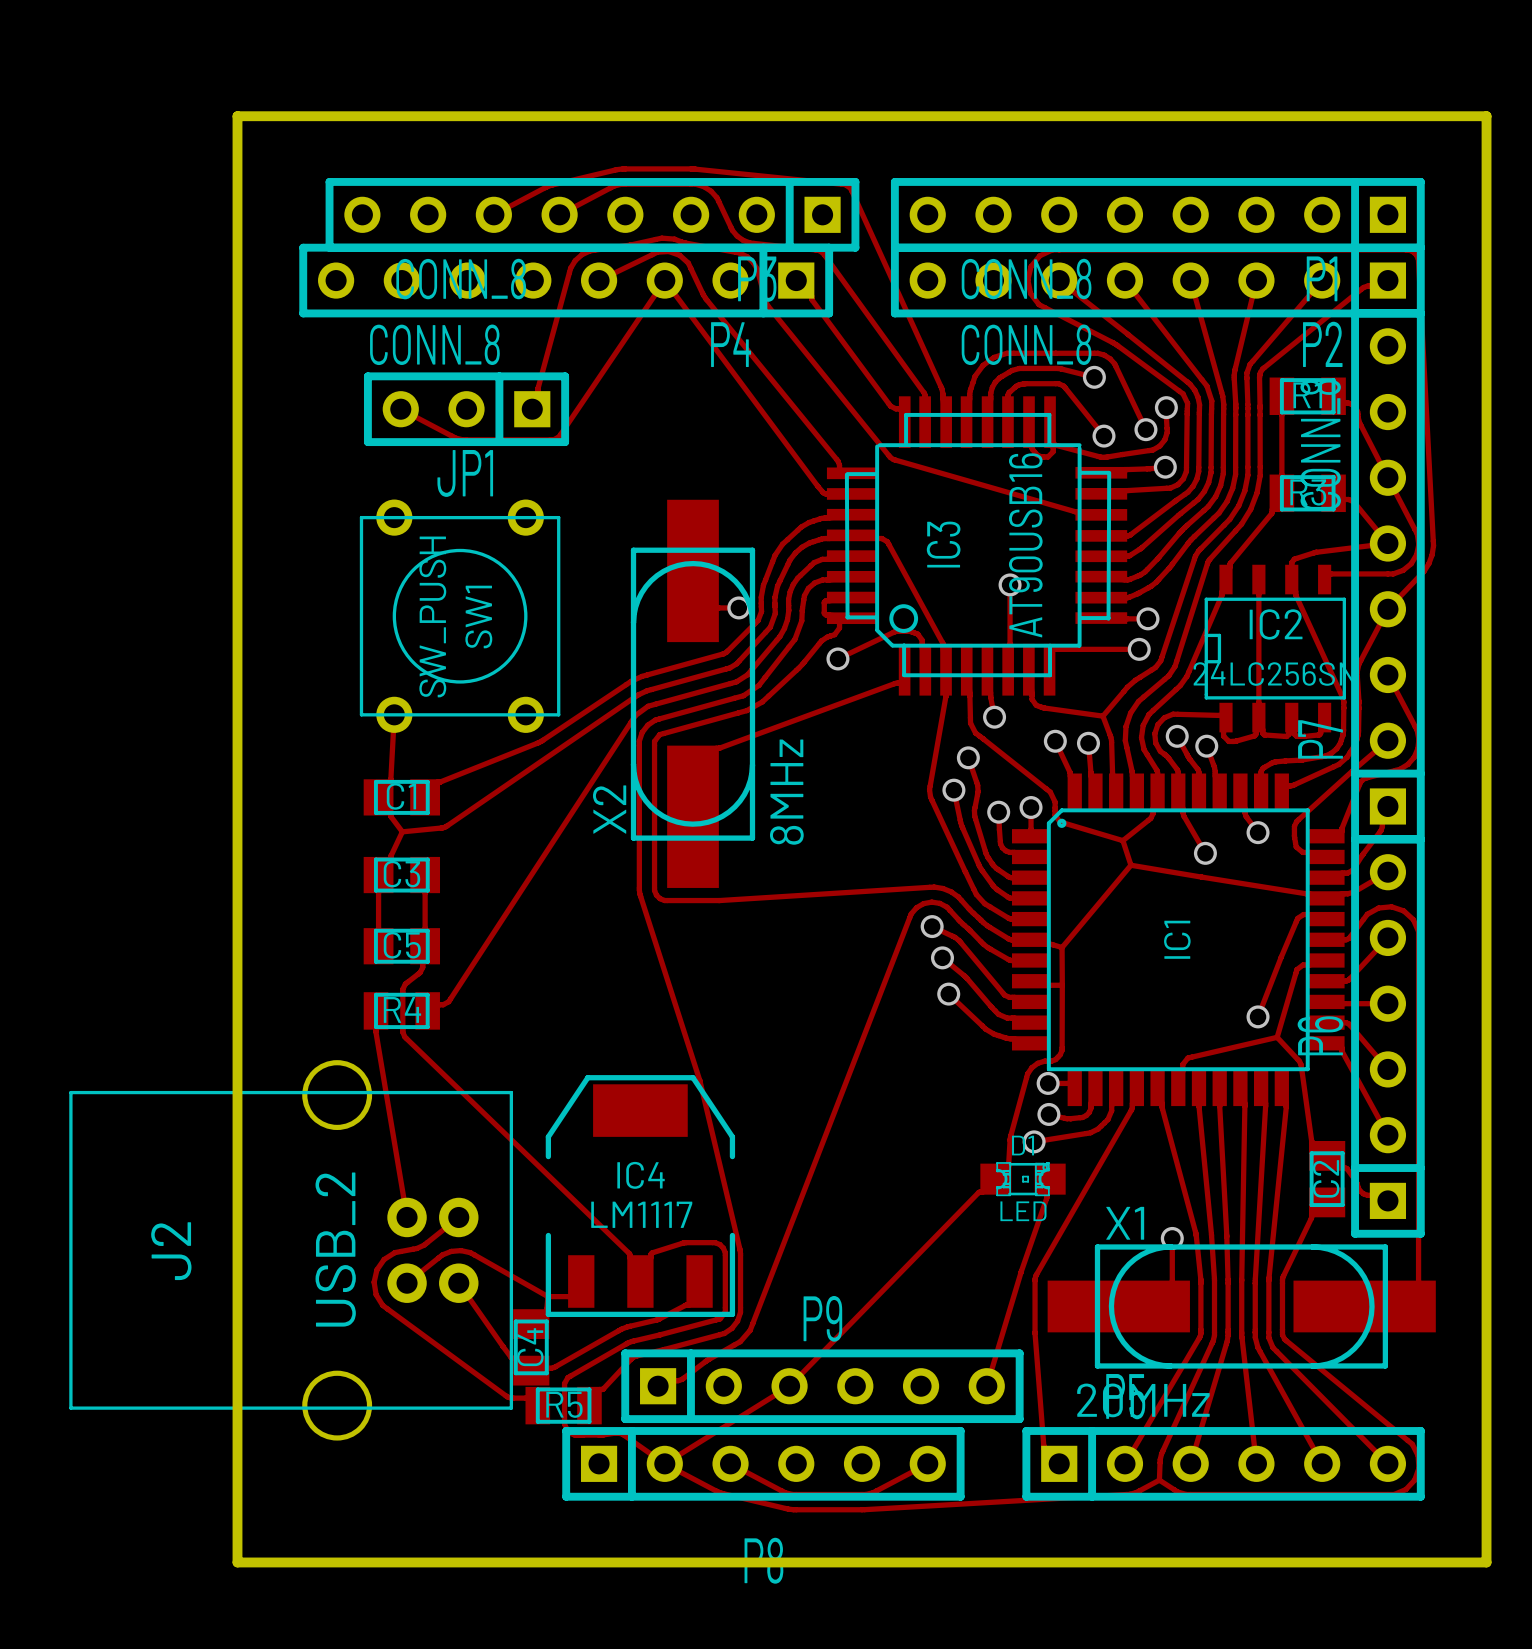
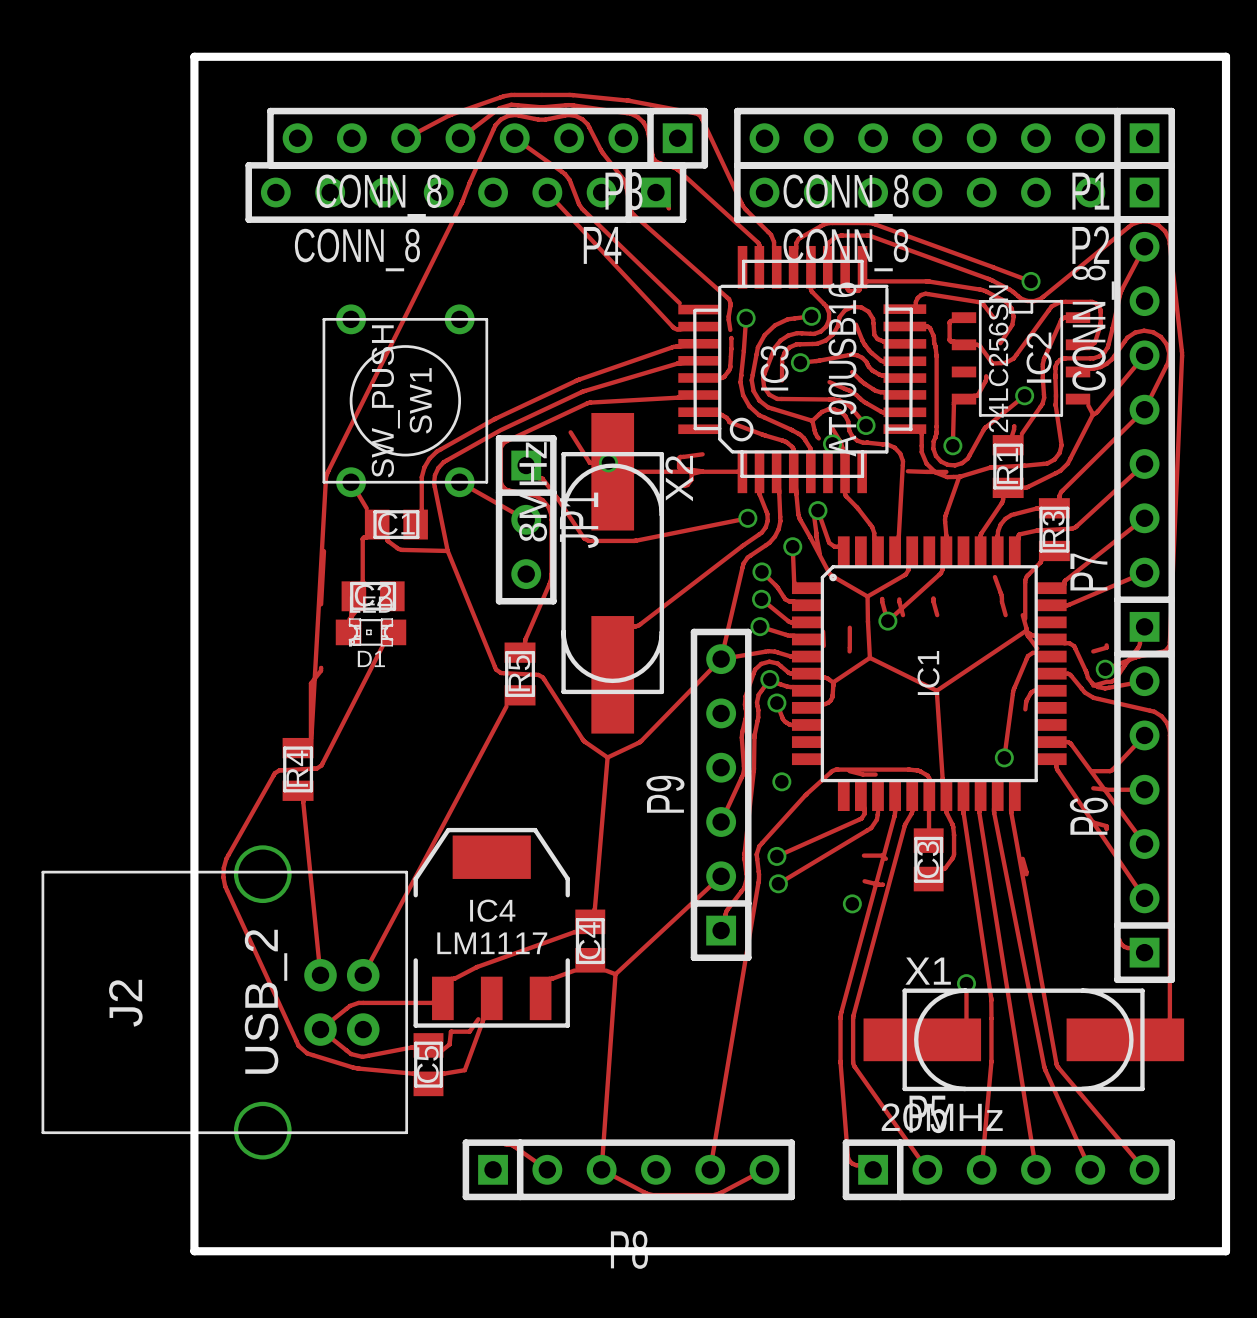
track: (545, 187) (622, 168) (694, 169) (845, 184) (850, 188) (941, 388) (946, 422) -> (448, 115) (511, 94) (570, 94) (627, 100) (696, 113) (700, 116) (742, 205) (771, 234) (774, 242) (776, 267)
track: (559, 214) (614, 185) (621, 184) (695, 184) (703, 186) (716, 197) (732, 230) (743, 240) (750, 243) (818, 250) (822, 252) (924, 393) (925, 422) -> (460, 138) (499, 108) (511, 104) (540, 107) (571, 105) (630, 113) (643, 122) (647, 129) (653, 157) (656, 162) (677, 169) (758, 243) (759, 267)
track: none -> (514, 138) (565, 174) (569, 179) (582, 208) (679, 303)
track: (599, 280) (657, 252) (668, 251) (679, 255) (688, 263) (705, 298) (838, 461) (839, 470) (852, 473) -> none
track: none -> (547, 192) (673, 328) (680, 329) (699, 326)
track: (1059, 280) (1190, 384) (1198, 397) (1199, 404) (1198, 471) (1193, 486) (1187, 492) (1129, 535) (1101, 535) -> none
track: (1124, 280) (1206, 386) (1211, 400) (1211, 472) (1204, 491) (1198, 499) (1141, 547) (1128, 556) (1101, 556) -> none
track: (1190, 280) (1222, 396) (1223, 473) (1220, 485) (1208, 506) (1181, 530) (1145, 571) (1128, 579) (1101, 576) -> none
track: (1256, 280) (1234, 370) (1235, 414) -> none
track: (1322, 280) (1250, 364) (1246, 372) (1247, 475) (1244, 490) (1238, 505) (1229, 519) (1195, 556) (1160, 660) (1155, 667) (1127, 687) (1102, 716) -> none
track: (1387, 280) (1363, 287) (1260, 372) (1260, 475) (1257, 492) (1250, 509) (1241, 524) (1207, 562) (1175, 666) (1168, 675) (1138, 701) (1130, 713) (1126, 726) (1125, 740) (1132, 771) -> none
track: (812, 300) (890, 406) (901, 408) (904, 422) -> none
track: none -> (1144, 246) (1121, 290) (1107, 347) (1104, 352) (1093, 358) (1063, 358) (1057, 362) (1055, 404) (1061, 445) (1059, 453) (1054, 459) (1047, 463) (990, 467) (959, 476)
track: none -> (793, 267) (796, 243) (798, 238) (829, 223) (869, 223) (1031, 281)
track: none -> (810, 267) (810, 289) (826, 306) (828, 320) (820, 331) (814, 333) (797, 333) (780, 340) (774, 347) (763, 377) (764, 387) (769, 394) (777, 398) (830, 399)
track: none -> (827, 267) (827, 244) (834, 237) (841, 235) (868, 235) (989, 279) (1009, 289) (1020, 298) (1034, 301) (1040, 298) (1132, 224) (1140, 221) (1149, 221) (1158, 225) (1165, 231) (1169, 239) (1182, 355) (1169, 645) (1165, 651) (1136, 657) (1105, 669)
track: none -> (845, 267) (849, 290) (859, 289) (862, 267) (865, 281) (928, 281) (985, 290) (1006, 301) (1011, 308) (1013, 316) (1012, 324) (1000, 343)
track: (1094, 377) (1057, 368) (1019, 368) (1012, 370) (999, 377) (992, 387) (987, 422) -> none
via: (1094, 377) -> none
via: none -> (1031, 281)
track: (1281, 396) (1281, 493) (1271, 513) -> none
R1 rotation: 0° (1307, 396) -> 90° clockwise (1008, 466)
R1 position: (1307, 396) -> (1008, 466)
track: (1333, 396) (1355, 407) (1359, 423) (1417, 534) (1418, 544) (1416, 554) (1411, 563) (1403, 570) (1393, 573) (1328, 573) (1324, 579) -> none
track: (1166, 407) (1167, 432) (1159, 446) (1152, 449) (1122, 454) -> none
via: (1166, 407) -> none
track: (400, 409) (455, 438) (462, 439) (553, 439) (559, 436) (664, 280) (823, 492) (852, 493) -> none
JP1 rotation: 0° (466, 409) -> 90° counterclockwise (526, 519)
JP1 position: (466, 409) -> (526, 519)
track: (532, 409) (570, 268) (575, 260) (590, 250) (661, 238) (674, 239) (684, 242) (739, 253) (753, 262) (757, 269) (767, 305) (890, 457) (1074, 511) -> none
track: (1235, 414) (1235, 474) (1227, 501) (1219, 513) (1190, 540) (1170, 567) (1151, 586) (1127, 597) (1101, 597) -> none
track: none -> (904, 309) (915, 306) (917, 297) (925, 293) (979, 302) (993, 317)
track: (966, 422) (970, 390) (975, 376) (983, 365) (994, 357) (1006, 353) (1097, 353) (1104, 355) (1114, 363) (1145, 429) -> none
track: (1007, 422) (1007, 395) (1016, 386) (1025, 383) (1058, 383) (1063, 386) (1104, 436) -> none
via: (1145, 429) -> none
track: none -> (811, 316) (787, 319) (774, 325) (764, 335) (757, 347) (751, 380) (753, 391) (759, 400) (768, 407) (812, 420)
via: none -> (811, 316)
track: none -> (746, 318) (741, 375)
via: none -> (746, 318)
track: none -> (963, 317) (949, 322) (949, 340) (963, 344) (977, 344) (992, 363) (1005, 362) (1013, 358) (1051, 306) (1060, 301) (1092, 301) (1096, 303) (1100, 310) (1100, 325) (1094, 342) (1092, 344) (1078, 344)
track: none -> (1078, 317) (1061, 319) (1043, 359) (1044, 397) (1042, 404) (1021, 433)
track: none -> (838, 321) (844, 310) (852, 306) (861, 307) (868, 311) (873, 319) (874, 334) (882, 341)
track: none -> (838, 321) (833, 334) (825, 340) (817, 343) (796, 344) (784, 352) (782, 359) (782, 380)
via: (1104, 436) -> none
track: none -> (856, 324) (864, 343) (881, 360) (904, 361)
track: none -> (904, 326) (930, 328) (933, 335) (936, 355)
track: (1053, 445) (1053, 451) (1047, 457) (1036, 454) (1032, 449) -> none
track: (1056, 445) (1100, 457) (1122, 454) -> none
track: none -> (730, 329) (729, 299) (632, 214) (623, 179) (602, 152) (587, 124) (582, 119) (568, 114) (545, 119) (515, 114) (500, 119) (495, 125) (461, 203) (327, 473) (311, 737)
track: none -> (731, 337) (730, 367) (724, 377) (699, 377)
track: none -> (699, 343) (673, 346) (578, 379) (495, 418) (436, 451) (424, 467) (421, 477) (421, 511) (415, 524)
track: (1165, 467) (1101, 472) -> none
via: (1165, 467) -> none
track: none -> (936, 355) (935, 437)
track: none -> (1144, 355) (1097, 412) (1093, 414)
track: none -> (699, 360) (677, 363) (583, 391) (501, 429)
track: none -> (800, 362) (857, 355) (866, 361) (872, 370) (879, 374) (904, 378)
via: none -> (800, 362)
track: (1101, 493) (1170, 488) (1177, 484) (1186, 471) (1187, 403) (1183, 393) (1116, 344) (1039, 304) (1030, 293) (1027, 280) (1031, 266) (1039, 255) (1052, 249) (1408, 249) (1416, 254) (1418, 259) (1433, 545) (1432, 554) (1423, 571) (1387, 609) (1358, 664) (1357, 672) (1358, 731) (1353, 746) (1347, 757) (1338, 764) (1292, 785) (1286, 786) (1281, 792) -> none
R3 rotation: 0° (1307, 493) -> 90° clockwise (1054, 529)
R3 position: (1307, 493) -> (1054, 529)
track: (1333, 493) (1343, 499) (1353, 501) (1387, 543) (1315, 552) (1294, 559) (1291, 562) (1291, 579) (1295, 595) -> none
track: none -> (852, 372) (875, 390) (904, 394)
track: none -> (1078, 371) (1106, 363) (1127, 337) (1135, 332) (1144, 330) (1153, 332) (1160, 336) (1166, 344) (1169, 353) (1168, 362) (1144, 409) (1061, 492) (1059, 500) (1054, 508) (1036, 508) (1011, 515) (1000, 524) (997, 535)
track: none -> (741, 375) (743, 395) (749, 406) (759, 415) (792, 430) (803, 438) (810, 449) (810, 471)
track: none -> (986, 376) (977, 395) (953, 402) (952, 445)
track: none -> (829, 382) (849, 390) (881, 411) (904, 412)
track: (1271, 513) (1230, 563) -> none
track: (852, 514) (821, 518) (809, 522) (782, 544) (775, 555) (763, 585) (761, 611) (758, 620) (726, 652) (641, 676) (631, 681) (541, 741) (440, 781) -> none
track: none -> (699, 395) (589, 402) (504, 442) (500, 447) (502, 485) (507, 490) (535, 495) (542, 500) (551, 515) (550, 581) (520, 652)
track: none -> (1024, 395) (985, 427) (967, 458) (962, 463) (955, 465) (940, 461) (933, 448) (935, 437)
via: none -> (1024, 395)
track: none -> (830, 399) (845, 403) (866, 425)
track: none -> (1088, 405) (1093, 414)
IC3 position: (977, 545) -> (802, 369)
track: none -> (1093, 414) (1067, 463) (1060, 470) (1027, 487) (1008, 487) (1003, 495) (1002, 502) (981, 533) (980, 551)
track: none -> (722, 415) (729, 422) (785, 441) (792, 447) (796, 493)
track: (852, 556) (822, 559) (814, 562) (793, 584) (788, 605) -> none
track: none -> (812, 420) (818, 438)
track: none -> (812, 420) (822, 411) (827, 409) (840, 411) (848, 421) (852, 436) (857, 440) (867, 442)
via: none -> (866, 425)
track: none -> (831, 426) (842, 447) (845, 494) (872, 527) (877, 551)
track: none -> (904, 429) (921, 431) (921, 452) (926, 463) (935, 472) (947, 477) (959, 476) (945, 515) (946, 551) (941, 573) (887, 621)
track: none -> (500, 430) (443, 462) (434, 475) (434, 483) (447, 550)
track: (852, 576) (822, 579) (808, 588) (804, 595) (801, 620) (794, 639) (759, 685) (743, 695) (655, 720) (642, 732) (639, 741) (640, 894) (699, 1080) -> none
track: (1258, 579) (1258, 717) -> none
track: none -> (867, 442) (882, 444)
track: (1010, 584) (1008, 669) -> none
track: none -> (883, 444) (894, 447) (900, 453) (903, 461) (898, 538) (895, 551)
via: none -> (952, 445)
track: (1221, 595) (1186, 676) (1180, 685) (1148, 714) (1143, 725) (1141, 737) (1144, 749) (1157, 770) (1157, 792) (1150, 818) (1122, 840) -> none
track: (1295, 595) (1343, 698) (1343, 729) -> none
track: (774, 605) (777, 586) (790, 560) (801, 547) (821, 539) (852, 535) (881, 538) (887, 541) (942, 642) -> none
track: (788, 605) (787, 619) (779, 636) (747, 674) (736, 681) (648, 706) (635, 715) (448, 1001) (443, 1004) (437, 1004) (427, 1010) -> none
track: (774, 606) (775, 613) (770, 627) (736, 663) (730, 667) (638, 694) (445, 826) (402, 831) -> none
track: none -> (1144, 463) (1075, 527) (1037, 530)
track: none -> (526, 465) (538, 478) (542, 479) (584, 538) (588, 540) (635, 540) (747, 518)
SW1 position: (460, 616) -> (405, 400)
track: none -> (612, 471) (742, 471)
track: none -> (759, 471) (759, 493) (767, 514) (765, 527) (761, 532) (640, 624) (631, 626) (612, 674)
track: none -> (776, 471) (780, 520) (778, 529) (769, 542) (747, 557) (743, 563) (721, 659)
via: (1147, 618) -> none
track: none -> (351, 482) (366, 508)
track: none -> (459, 482) (526, 519)
track: (830, 636) (821, 641) (798, 668) (762, 702) (746, 710) (659, 734) (654, 741) (654, 890) (656, 895) (664, 900) (719, 900) (934, 887) (951, 891) (983, 922) (1009, 939) (1030, 939) (1062, 947) -> none
track: (942, 642) (946, 669) (946, 695) (929, 789) (930, 796) (976, 894) (984, 903) (1009, 918) (1030, 919) -> none
track: none -> (796, 494) (799, 518) (829, 573) (867, 596)
IC2 rotation: 0° (1275, 648) -> 90° clockwise (1021, 358)
IC2 position: (1275, 648) -> (1021, 358)
track: (1139, 649) (1052, 649) (1049, 669) -> none
via: (1139, 649) -> none
track: (837, 658) (894, 631) (908, 631) (917, 634) (922, 640) (925, 669) -> none
via: (837, 658) -> none
track: none -> (817, 510) (829, 542) (834, 546) (840, 546) (843, 551)
via: none -> (817, 510)
track: (904, 669) (901, 683) (894, 683) (719, 748) -> none
track: (966, 669) (970, 723) (975, 733) (1050, 792) (1055, 802) (1054, 815) (1059, 821) (1122, 840) -> none
track: (1028, 669) (1032, 699) (1036, 705) (1102, 716) -> none
via: none -> (747, 518)
track: (1387, 674) (1417, 730) (1417, 748) (1414, 757) (1400, 769) (1364, 778) (1360, 781) (1342, 828) -> (1144, 518) (1065, 580) (1064, 584) (1051, 588)
track: none -> (1036, 530) (1019, 534) (1014, 551)
X2 rotation: 0° (693, 693) -> 180° (612, 573)
track: none -> (792, 546) (794, 584) (807, 588)
via: none -> (792, 546)
track: none -> (447, 550) (398, 548) (387, 540) (387, 537) (377, 524) (367, 537) (362, 538) (362, 583) (353, 596) (348, 632)
track: none -> (447, 550) (496, 669) (500, 673) (538, 674) (542, 677) (583, 740) (607, 757)
track: none -> (1054, 550) (1041, 558) (1040, 562) (1026, 576) (1025, 618)
track: none -> (912, 551) (905, 574) (867, 596)
track: (1102, 716) (1111, 740) (1112, 776) (1116, 792) -> none
via: (994, 717) -> none
track: (1258, 717) (1264, 734) (1286, 736) (1289, 734) (1291, 717) (1294, 734) (1296, 736) (1319, 734) (1324, 717) -> none
track: (1258, 717) (1254, 735) (1234, 741) (1228, 741) (1223, 736) (1226, 717) (1222, 715) (1173, 714) (1164, 717) (1157, 724) (1154, 733) (1155, 743) (1160, 751) (1168, 757) (1177, 770) (1178, 792) (1183, 815) (1205, 853) -> none
track: (1343, 731) (1336, 748) (1325, 756) (1274, 761) (1263, 768) (1261, 771) (1261, 792) -> none
track: (1177, 736) (1198, 770) (1198, 792) -> none
via: (1177, 736) -> none
track: none -> (761, 571) (776, 585) (785, 599) (807, 605)
via: none -> (761, 571)
track: (1387, 740) (1296, 821) (1294, 826) (1296, 846) (1302, 852) (1325, 856) -> (1144, 572) (1068, 605) (1051, 605)
track: (1055, 741) (1070, 772) -> none
via: (1055, 741) -> none
track: (1088, 743) (1090, 772) -> none
via: (1088, 743) -> none
via: (1206, 746) -> none
track: (968, 757) (977, 785) (974, 816) (987, 857) (996, 868) (1008, 877) (1030, 877) -> none
via: (968, 757) -> none
track: none -> (867, 596) (869, 657)
track: none -> (761, 599) (789, 621) (807, 622)
via: none -> (761, 599)
track: (953, 790) (961, 826) (982, 871) (993, 886) (1008, 897) (1030, 898) -> none
via: (953, 790) -> none
C1 position: (401, 797) -> (396, 524)
via: none -> (887, 621)
track: none -> (760, 626) (807, 639)
via: none -> (760, 626)
via: (1031, 807) -> none
via: (998, 812) -> none
track: (391, 817) (402, 831) -> none
track: none -> (382, 646) (321, 765) (316, 768) (279, 770) (274, 773) (226, 858) (223, 877) (225, 886) (298, 1045) (307, 1053) (353, 1067) (413, 1073)
track: (999, 830) (1000, 843) (1005, 850) (1030, 856) -> none
track: (402, 831) (391, 855) -> none
via: (1258, 832) -> none
track: (1122, 840) (1130, 865) -> none
track: none -> (807, 656) (790, 656) (768, 651) (721, 659)
track: none -> (1051, 656) (1037, 652) (1032, 652) (1027, 656) (1013, 692) (1004, 757)
track: none -> (869, 657) (936, 690)
track: none -> (869, 657) (833, 682)
track: none -> (721, 659) (640, 741) (607, 757)
via: (1205, 853) -> none
via: none -> (1105, 669)
track: (1130, 865) (1309, 893) (1325, 898) (1353, 892) (1387, 872) -> (936, 690) (1025, 630) (1034, 635) (1069, 643) (1074, 646) (1087, 677) (1098, 687) (1105, 688) (1144, 681)
track: (1130, 865) (1062, 947) -> none
via: none -> (769, 679)
track: none -> (833, 682) (827, 678) (807, 673) (790, 673) (777, 663) (769, 661) (761, 663) (755, 669) (745, 696) (746, 716) (741, 737) (743, 774) (721, 822)
track: none -> (833, 682) (830, 700) (824, 704) (807, 707)
C3 rotation: 0° (401, 875) -> 90° clockwise (928, 859)
C3 position: (401, 875) -> (928, 859)
track: (425, 875) (425, 946) (422, 967) (420, 972) (405, 984) (402, 989) (402, 1032) (404, 1036) (629, 1253) -> none
track: none -> (807, 690) (787, 686) (769, 679) (758, 694) (756, 702) (758, 717) (754, 736) (753, 770) (744, 854) (746, 878) (744, 887) (726, 910) (721, 930)
track: none -> (936, 690) (942, 782) (946, 795) (946, 811) (952, 824) (954, 834)
track: none -> (1051, 690) (1031, 692) (1026, 700) (1025, 709)
track: none -> (776, 702) (784, 721) (791, 724) (807, 724)
via: none -> (776, 702)
track: none -> (506, 706) (363, 975)
track: (1325, 919) (1309, 914) (1303, 914) (1297, 918) (1258, 1016) -> none
track: (932, 926) (959, 940) (1004, 995) (1030, 1001) -> none
via: (932, 926) -> none
track: (1418, 937) (1418, 931) (1413, 919) (1403, 910) (1391, 906) (1378, 908) (1367, 914) (1349, 938) (1325, 939) -> (1169, 735) (1167, 723) (1154, 711) (1093, 697) (1084, 692) (1070, 674) (1051, 673)
IC1 position: (1178, 939) -> (929, 673)
C5 rotation: 0° (401, 946) -> 90° clockwise (428, 1064)
C5 position: (401, 946) -> (428, 1064)
track: (1062, 947) (1062, 1050) (1055, 1059) (1037, 1063) (1027, 1073) (1010, 1136) (1008, 1166) (982, 1192) (978, 1192) -> none
track: (942, 957) (966, 977) (998, 1014) (1030, 1022) -> none
via: (942, 957) -> none
track: (1030, 960) (1009, 959) (987, 947) (947, 907) (939, 903) (923, 903) (916, 907) (911, 914) (750, 1330) (740, 1341) (707, 1359) (682, 1379) (658, 1386) -> none
track: (1325, 960) (1303, 964) (1296, 969) (1277, 1037) -> none
track: none -> (607, 757) (594, 908)
via: none -> (1004, 757)
track: none -> (909, 769) (832, 771) (805, 795) (759, 846) (756, 854) (758, 879) (710, 1169)
track: none -> (909, 769) (919, 771) (929, 778) (928, 840)
track: (948, 994) (985, 1029) (1006, 1038) (1030, 1043) -> none
track: (376, 1010) (375, 1031) (407, 1217) -> none
R4 rotation: 0° (401, 1010) -> 90° clockwise (298, 769)
R4 position: (401, 1010) -> (298, 769)
track: none -> (860, 795) (864, 808) (864, 813) (861, 818) (776, 856)
track: none -> (895, 795) (894, 815) (840, 1016) (840, 1063) (847, 1157) (852, 1163) (873, 1169)
via: (1258, 1016) -> none
track: none -> (303, 801) (320, 975)
track: (1325, 1022) (1348, 1023) (1387, 1069) -> (1051, 742) (1070, 743) (1144, 844)
track: none -> (963, 811) (991, 997) (991, 1061)
track: none -> (878, 811) (876, 819) (871, 828) (778, 883)
track: (1277, 1037) (1301, 1064) (1311, 1143) (1342, 1168) (1346, 1168) (1357, 1185) -> none
track: (1277, 1037) (1187, 1058) (1182, 1064) (1178, 1087) -> none
track: (1342, 1051) (1387, 1135) -> (1051, 759) (1056, 762) (1057, 769) (1144, 898)
track: none -> (954, 834) (952, 857) (945, 868) (941, 868) (928, 879)
track: (700, 1081) (740, 1250) (740, 1312) (737, 1321) (724, 1333) (635, 1356) (603, 1389) (599, 1389) (589, 1405) -> none
via: (1048, 1083) -> none
via: none -> (776, 856)
track: (1095, 1087) (1089, 1112) (1082, 1117) (1071, 1118) -> none
track: (1116, 1087) (1107, 1119) (1098, 1129) (1090, 1132) (1034, 1141) -> none
track: (1136, 1087) (1131, 1109) (1035, 1279) -> (912, 795) (911, 813) (904, 825) (853, 1017)
track: (1157, 1087) (1195, 1233) (1200, 1279) -> none
track: (1198, 1087) (1198, 1106) (1214, 1278) (1214, 1335) (1161, 1453) (1159, 1480) -> none
track: (1219, 1087) (1226, 1235) (1228, 1335) (1190, 1463) -> (991, 1062) (981, 1169)
track: (1261, 1087) (1265, 1106) (1255, 1280) (1255, 1337) (1257, 1347) (1322, 1463) -> (997, 795) (994, 812) (1044, 1066) (1090, 1169)
track: (1244, 1106) (1241, 1333) (1256, 1463) -> (979, 812) (1035, 1169)
track: (1286, 1107) (1268, 1278) (1268, 1337) (1272, 1347) (1387, 1463) -> (1014, 795) (1011, 812) (1056, 1064) (1144, 1169)
track: none -> (721, 876) (615, 974)
via: (1048, 1114) -> none
via: none -> (778, 883)
track: none -> (574, 932) (477, 966)
D1 rotation: 0° (1023, 1179) -> 180° (370, 632)
D1 position: (1023, 1179) -> (370, 632)
track: (1050, 1179) (1046, 1197) (1021, 1271) (986, 1386) -> none
C2 rotation: 0° (1327, 1179) -> 90° clockwise (373, 596)
C2 position: (1327, 1179) -> (373, 596)
track: (978, 1192) (789, 1386) (664, 1463) (721, 1493) (793, 1509) (864, 1509) (1130, 1494) (1159, 1480) -> none
IC4 position: (640, 1196) -> (491, 927)
track: (458, 1217) (424, 1245) (394, 1252) (384, 1259) (376, 1269) (374, 1282) (376, 1294) (382, 1305) (507, 1396) (528, 1398) (537, 1405) -> none
track: none -> (477, 967) (454, 978)
track: (1311, 1218) (1283, 1276) (1282, 1334) (1284, 1339) (1412, 1444) (1418, 1455) (1418, 1468) (1414, 1480) (1405, 1489) (1394, 1494) (1186, 1494) (1177, 1492) (1159, 1480) -> none
track: none -> (574, 970) (552, 978)
track: none -> (606, 970) (615, 974)
track: none -> (615, 974) (601, 1169)
track: none -> (454, 978) (451, 978) (442, 998) (434, 1002) (358, 1002) (350, 1005) (320, 1029) (351, 1054) (362, 1056) (428, 1045)
J2 position: (291, 1250) -> (224, 1002)
track: (629, 1253) (640, 1281) (651, 1252) (685, 1242) (715, 1242) (719, 1244) (725, 1252) (725, 1312) (720, 1318) (627, 1343) (567, 1377) (564, 1383) (566, 1428) (575, 1435) (612, 1433) -> none
track: (1200, 1279) (1200, 1336) (1124, 1463) -> none
track: (407, 1283) (442, 1254) (461, 1250) (470, 1252) (548, 1296) -> none
track: (458, 1283) (502, 1346) -> none
track: none -> (482, 1020) (464, 1070) (443, 1073)
track: (685, 1305) (658, 1319) (621, 1329) (551, 1368) (531, 1370) (515, 1358) (511, 1357) (503, 1346) -> none
track: (1035, 1333) (1043, 1448) (1059, 1463) -> (853, 1062) (927, 1169)
C4 position: (531, 1347) -> (590, 941)
P9 rotation: 0° (822, 1386) -> 90° counterclockwise (721, 794)
P9 position: (822, 1386) -> (721, 794)
R5 rotation: 0° (563, 1405) -> 90° clockwise (520, 673)
R5 position: (563, 1405) -> (520, 673)

